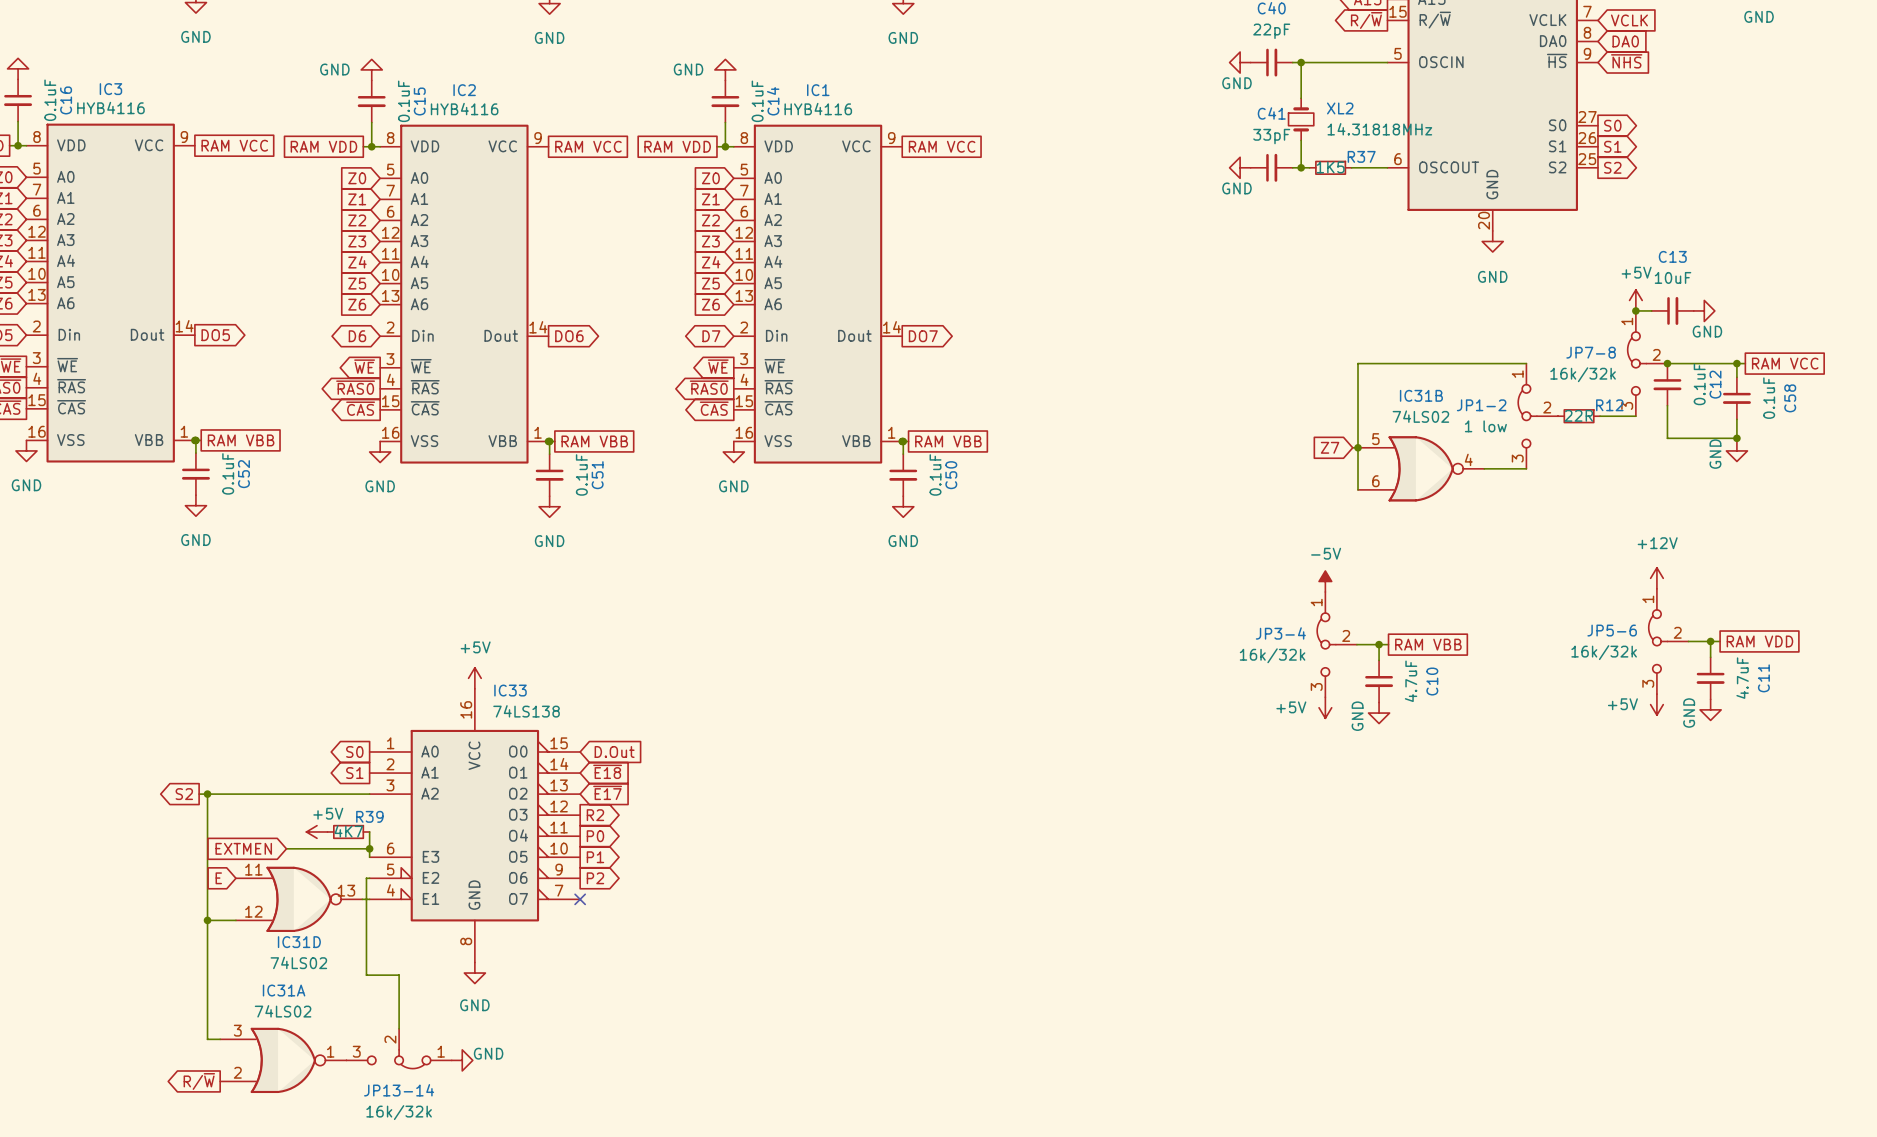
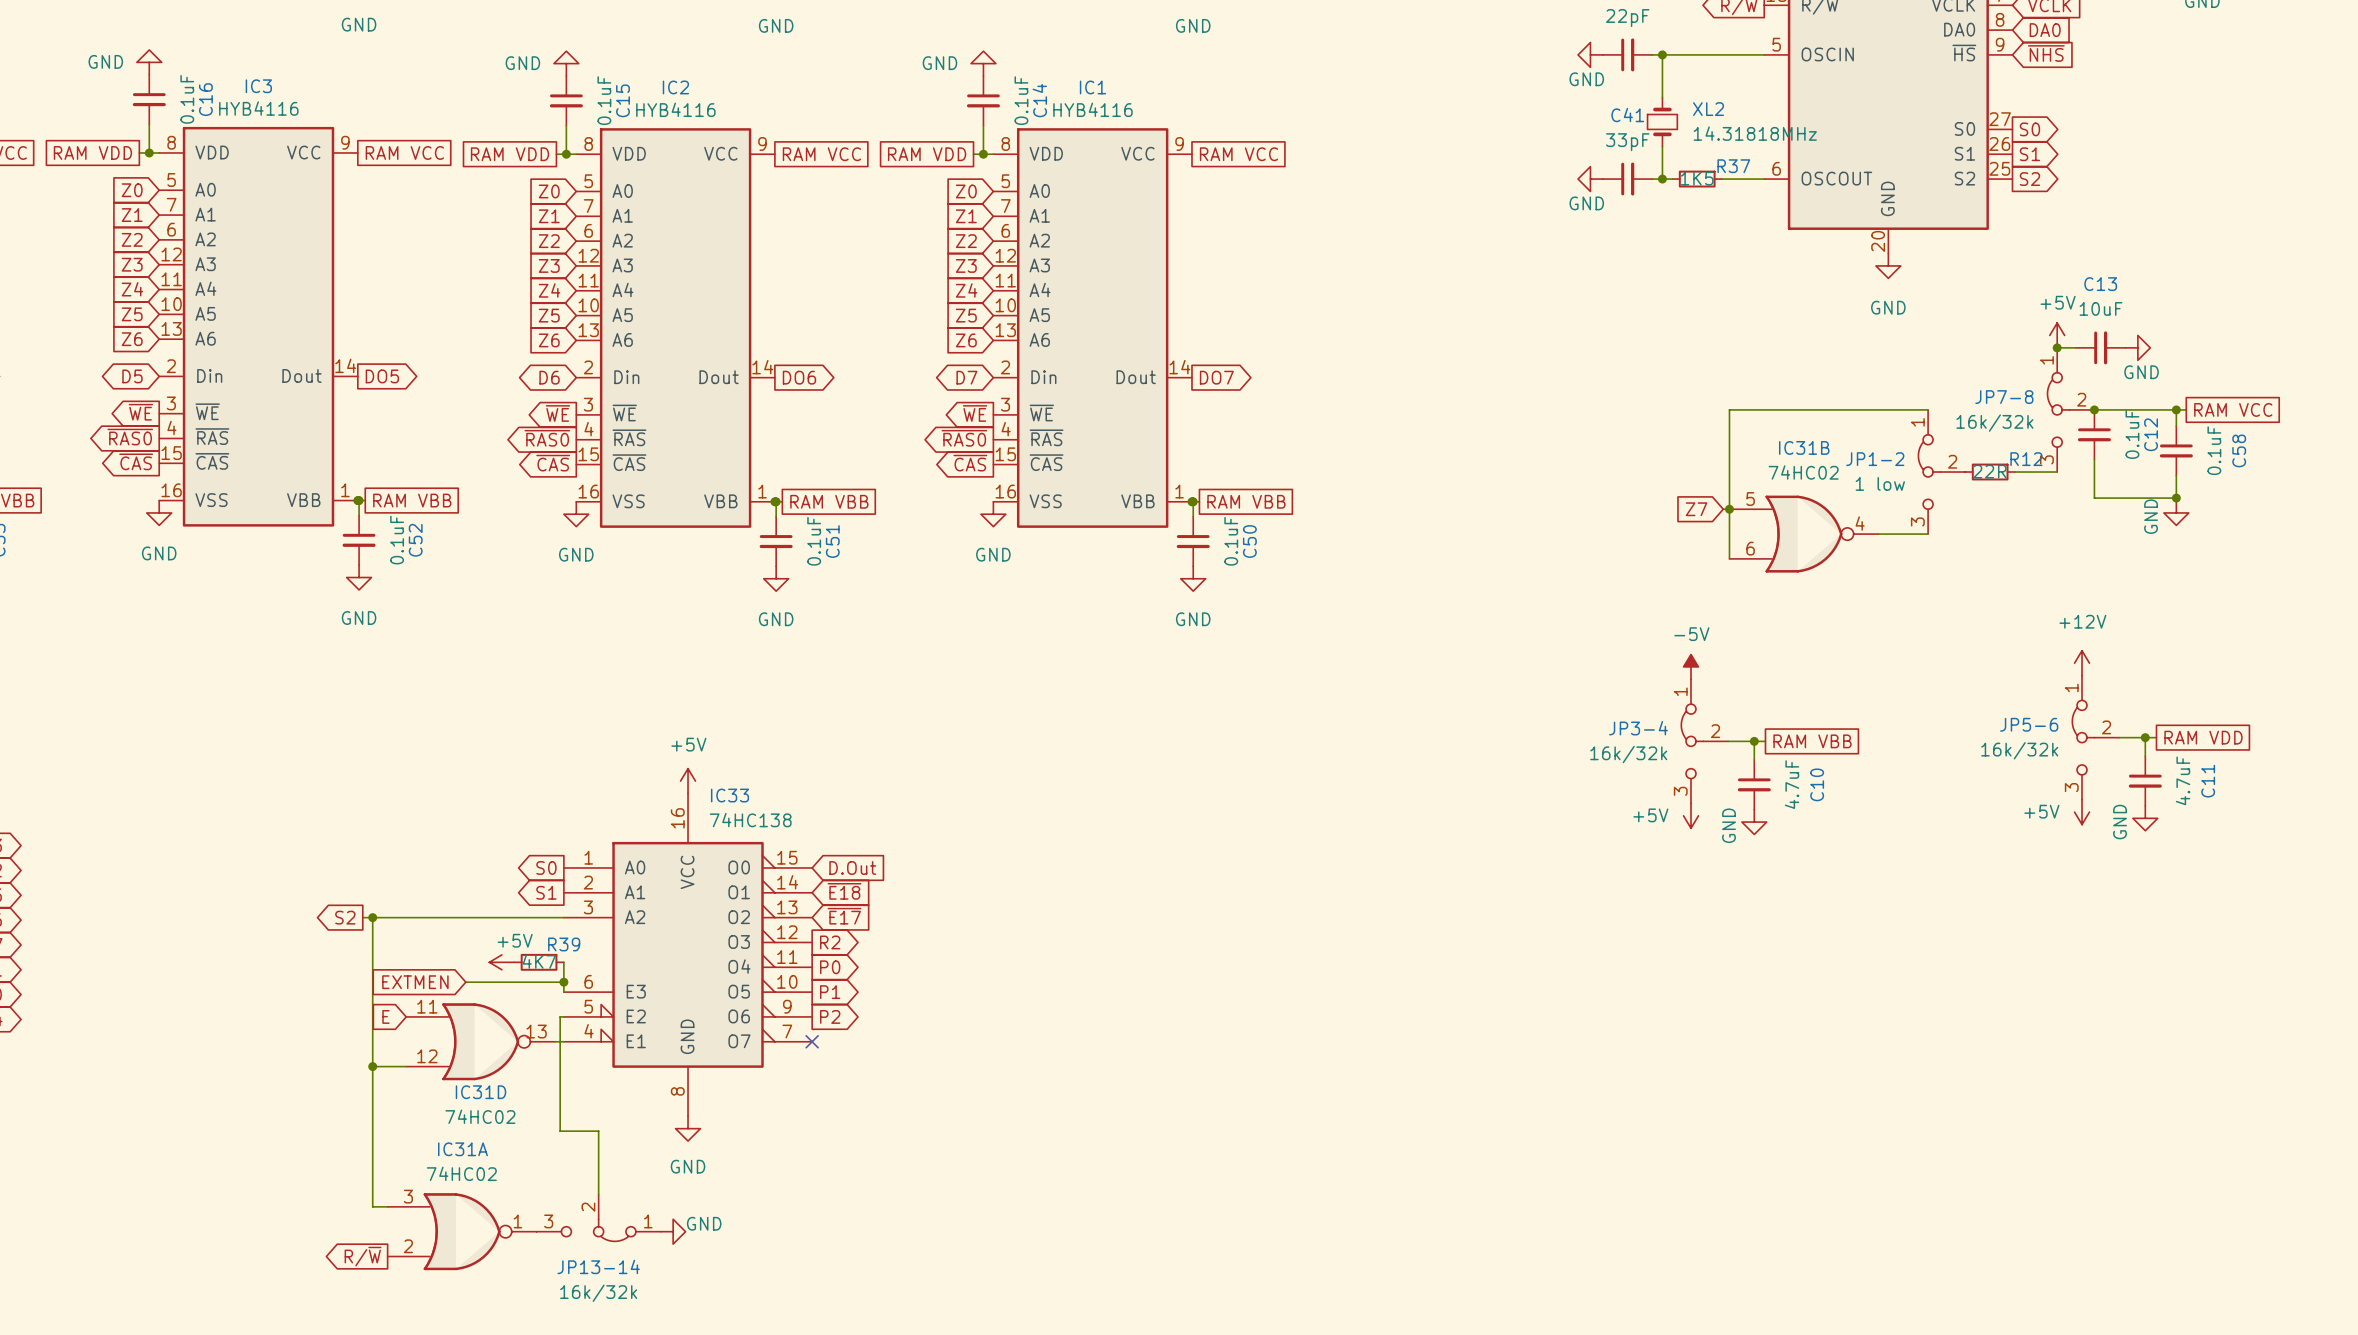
IC31B value: 74LS02 (1420, 416) -> 74HC02 (1803, 472)
IC33 value: 74LS138 (526, 711) -> 74HC138 (750, 820)
IC31D value: 74LS02 (298, 962) -> 74HC02 (480, 1116)
IC31A value: 74LS02 (283, 1011) -> 74HC02 (461, 1173)

